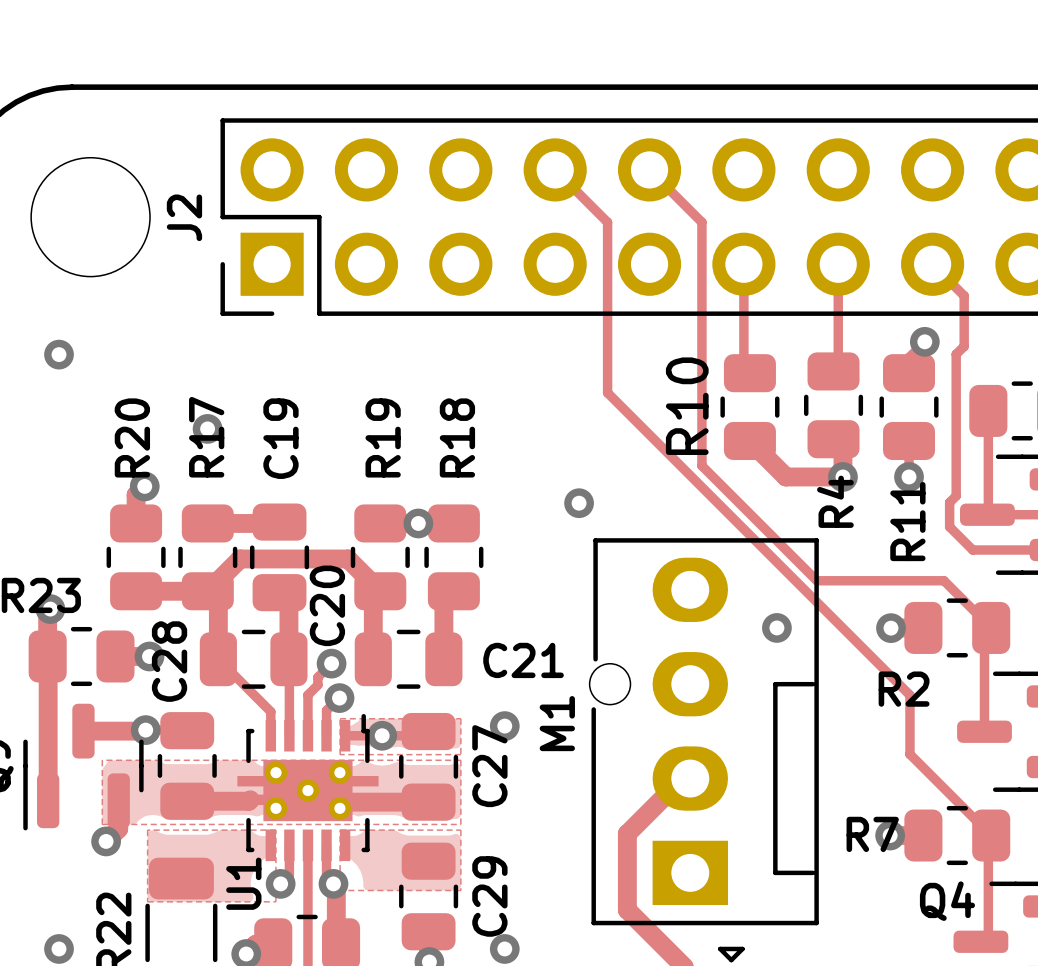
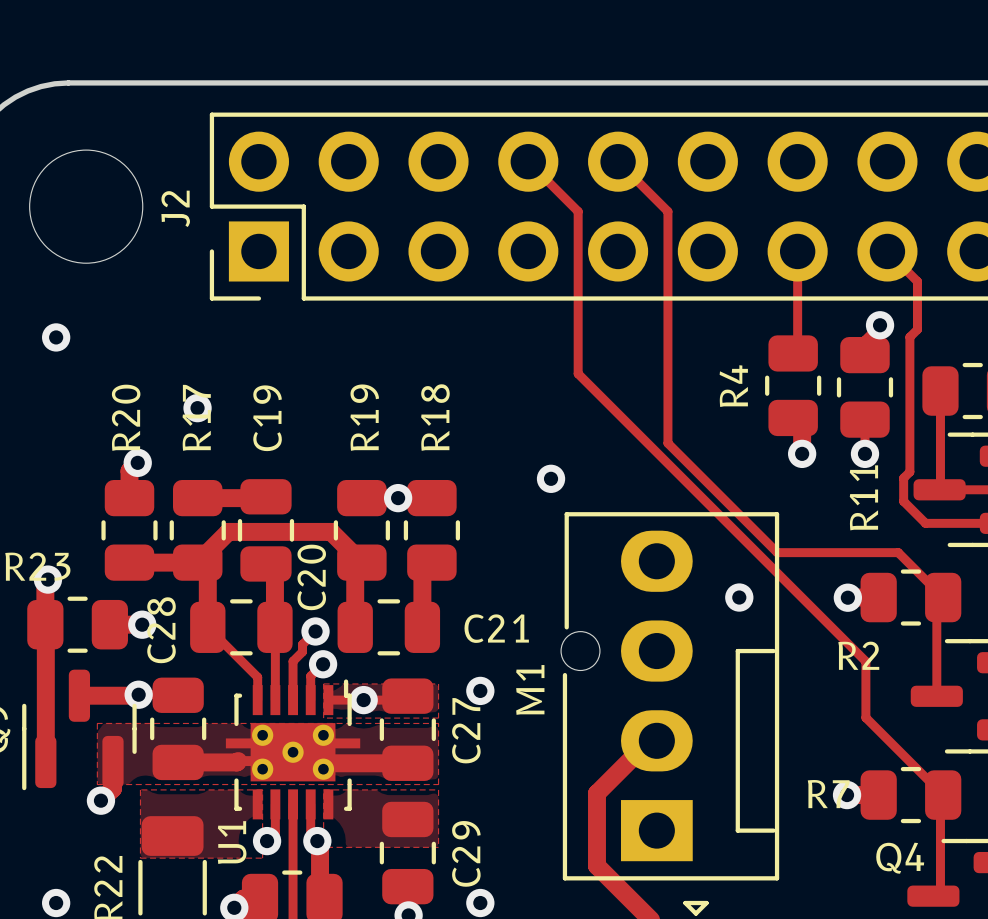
track: (743, 264) (743, 367) (749, 373) -> none
R10: (749, 407) -> none
track: (749, 440) (785, 476) (842, 476) -> none
R4 name position: R4 (835, 501) -> R4 (733, 386)

